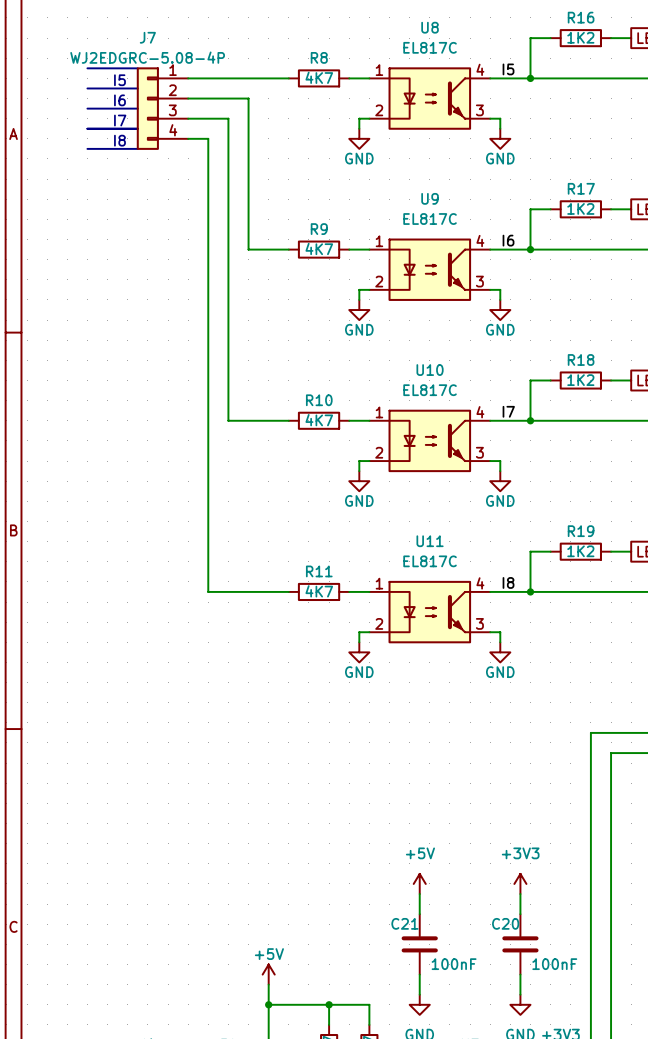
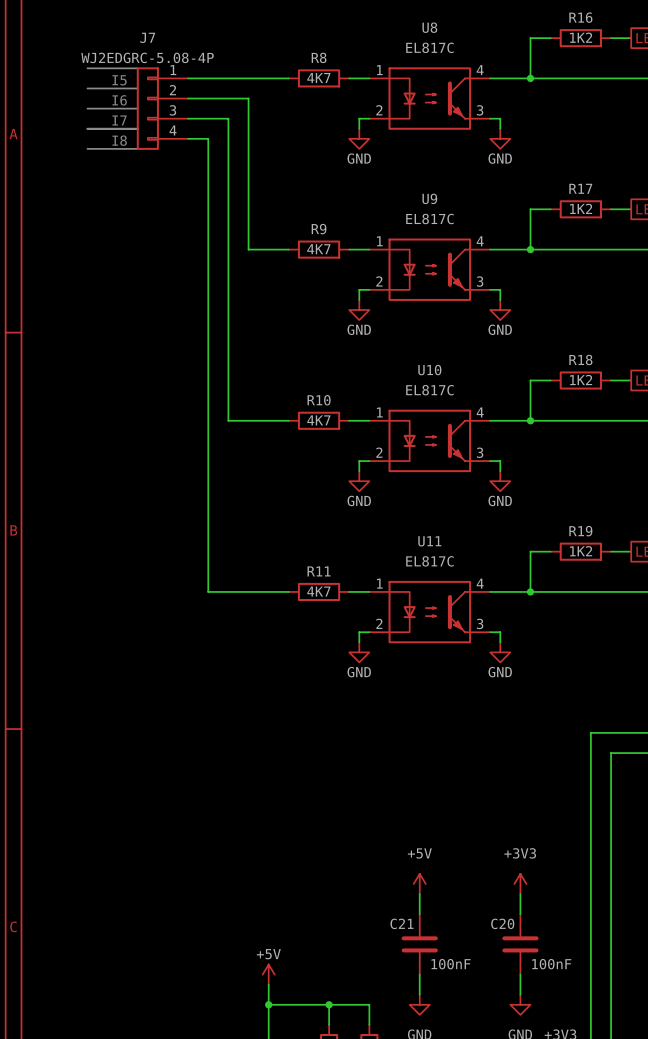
label: I5 (508, 69) -> none
label: I6 (508, 240) -> none
label: I7 (508, 411) -> none
label: I8 (508, 582) -> none

